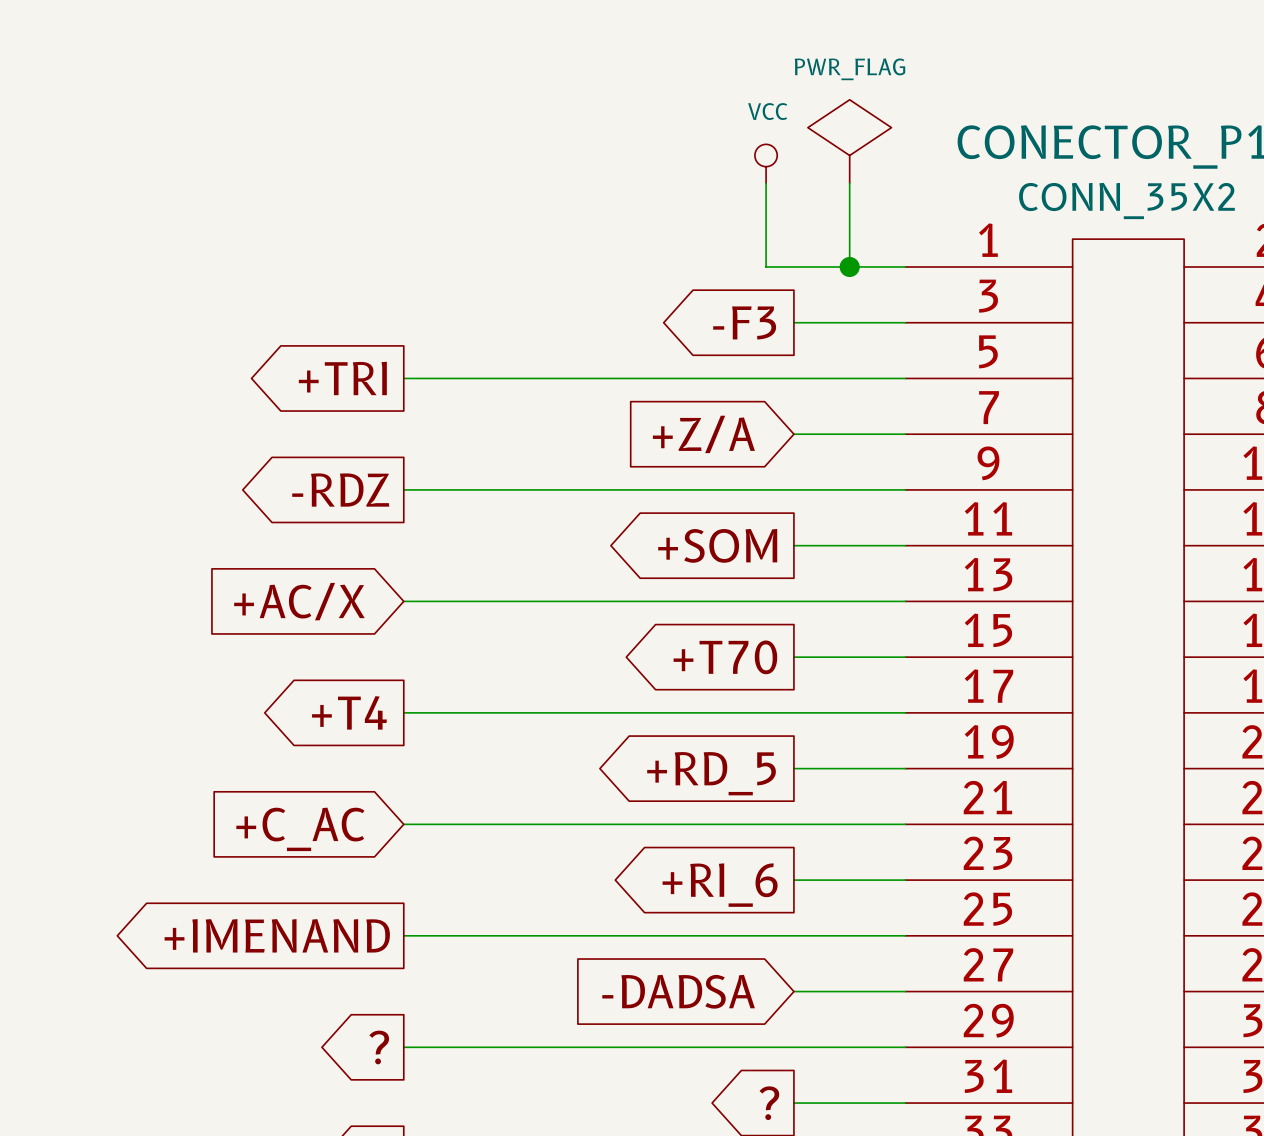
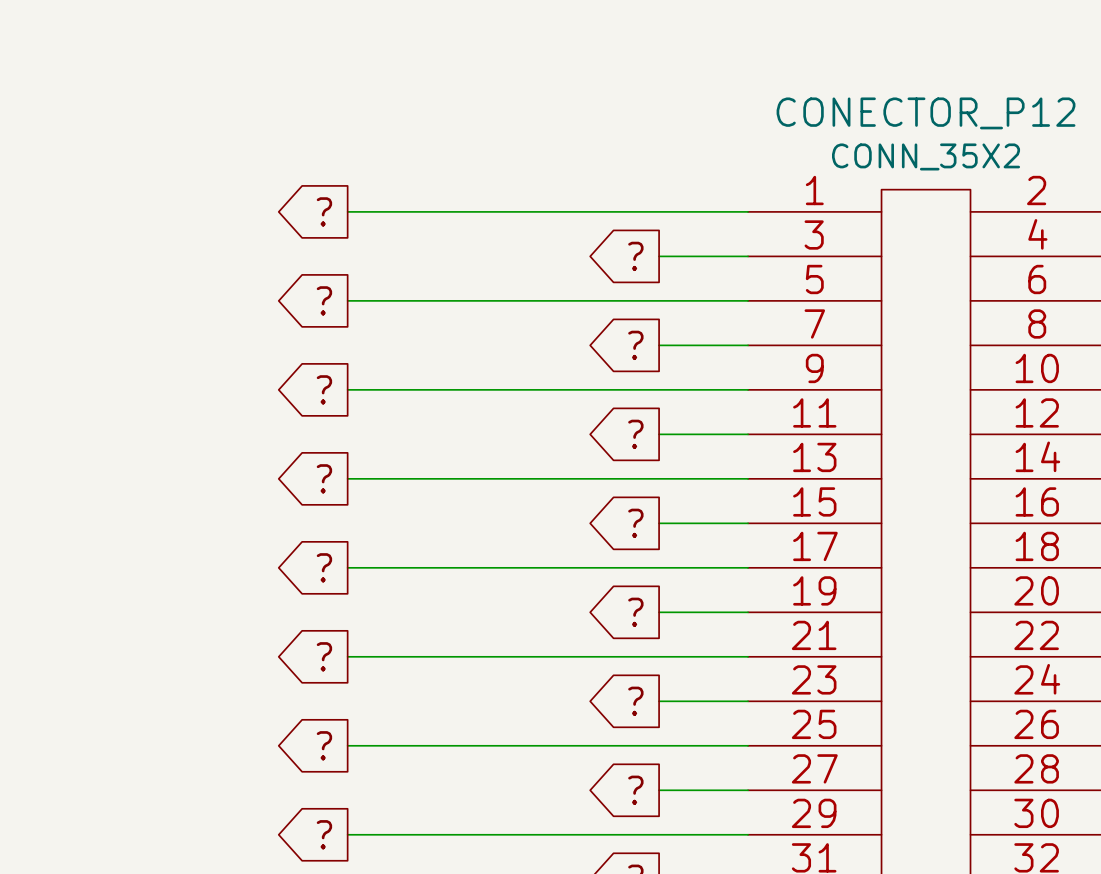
power symbol: PWR_FLAG (849, 141) -> none
power symbol: VCC (766, 163) -> none
wire: (766, 183) (766, 266) -> (347, 211) (636, 211)
wire: (849, 183) (849, 266) -> none
junction: (849, 266) -> none
global label: none -> ? (324, 211)
global label: -F3 (744, 322) -> ? (635, 256)
global label: +TRI (342, 378) -> ? (324, 300)
global label shape: input (703, 434) -> output (635, 345)
global label: +Z/A (703, 434) -> ? (635, 345)
global label: -RDZ (340, 490) -> ? (324, 389)
global label: +SOM (717, 545) -> ? (635, 434)
global label shape: input (299, 601) -> output (324, 478)
global label: +AC/X (299, 601) -> ? (324, 478)
global label: +T70 (725, 657) -> ? (635, 523)
global label: +T4 (349, 712) -> ? (324, 567)
global label: +RD_5 (711, 773) -> ? (635, 612)
global label shape: input (300, 829) -> output (324, 656)
global label: +C_AC (300, 829) -> ? (324, 656)
global label: +RI_6 (720, 885) -> ? (635, 701)
global label: +IMENAND (277, 935) -> ? (324, 745)
global label shape: input (678, 991) -> output (635, 790)
global label: -DADSA (678, 991) -> ? (635, 790)

